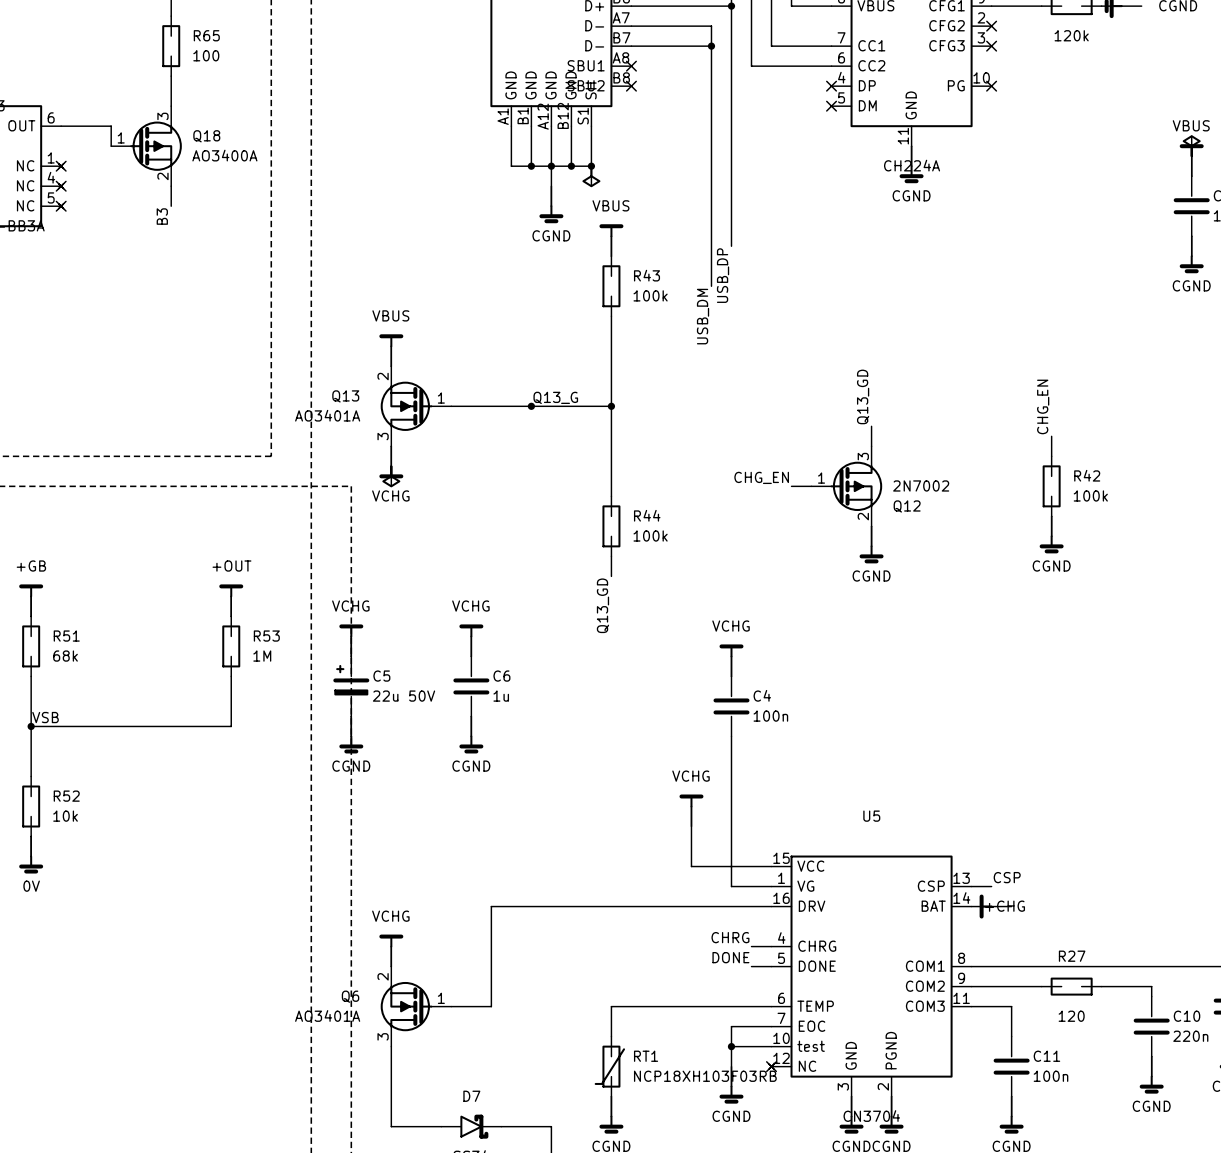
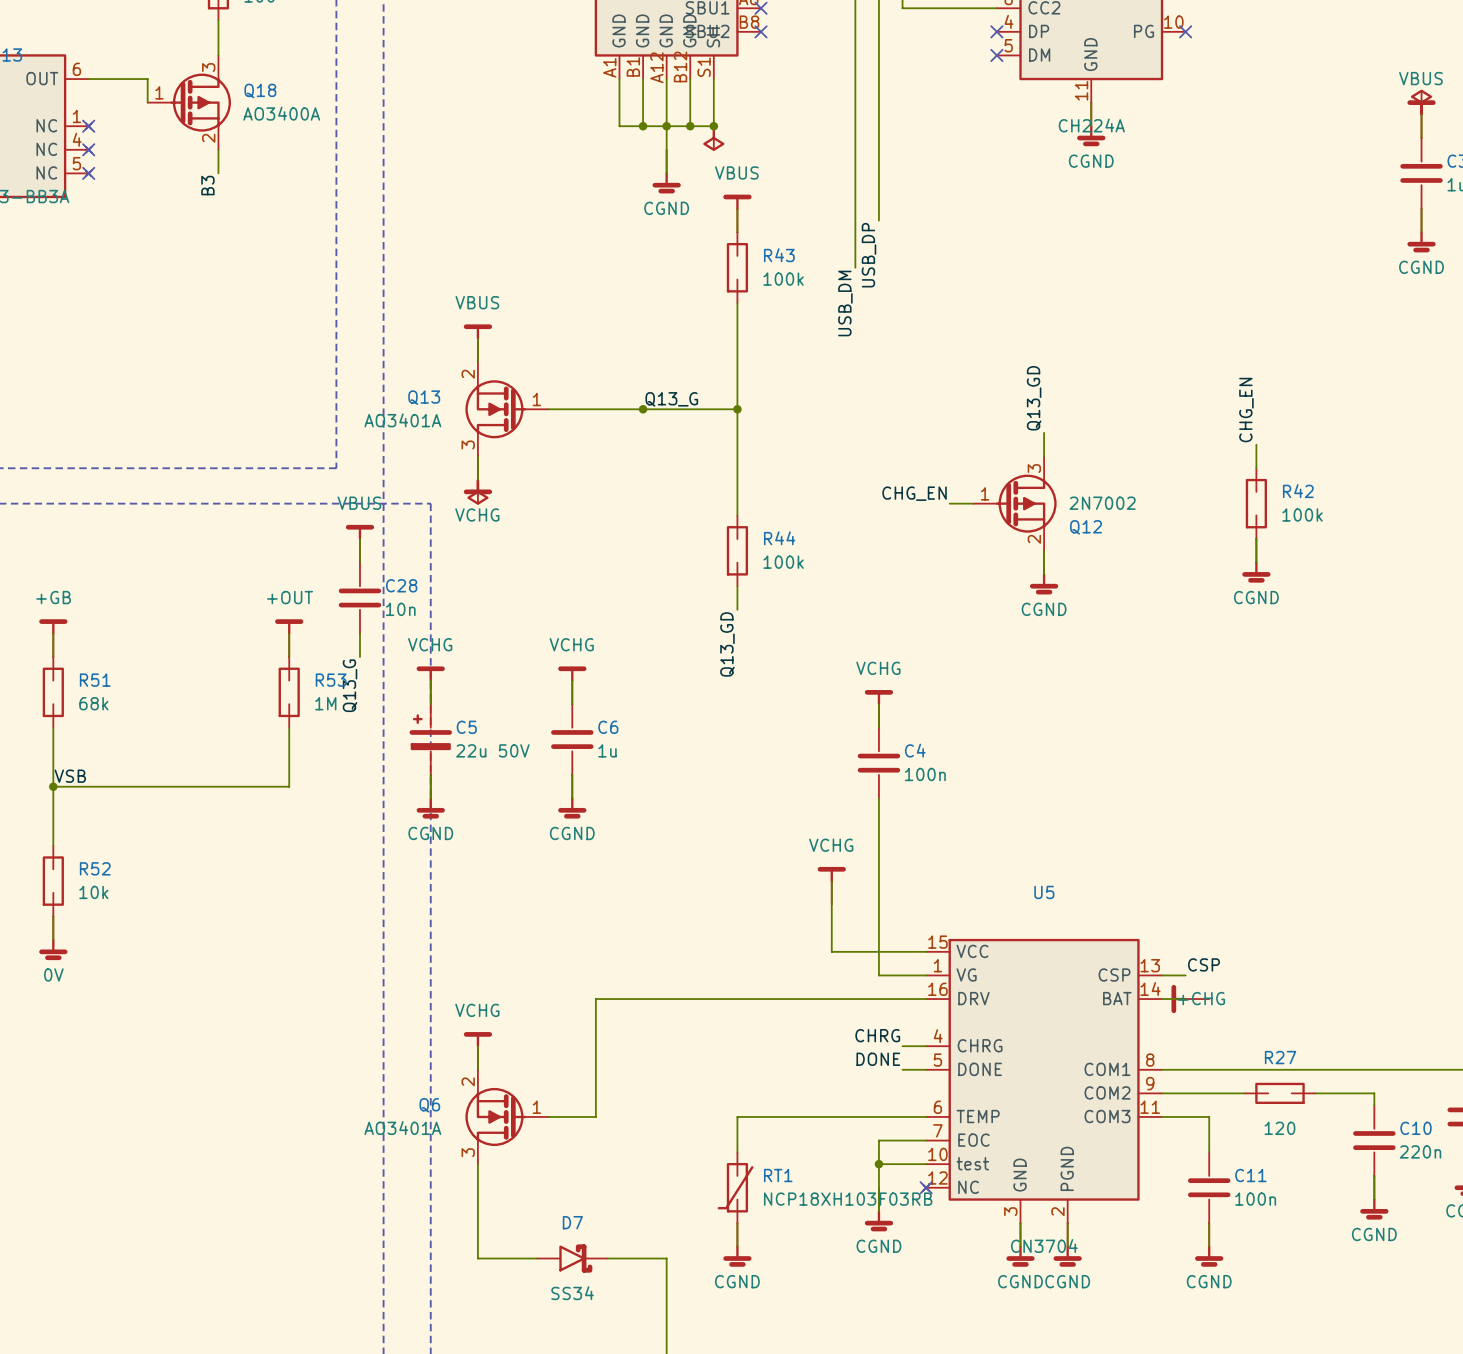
wire: none -> (359, 539) (359, 562)
power symbol: none -> VBUS (359, 543)
C28: none -> 10n (359, 598)
wire: none -> (359, 633) (359, 656)
label: none -> Q13_G (350, 685)

